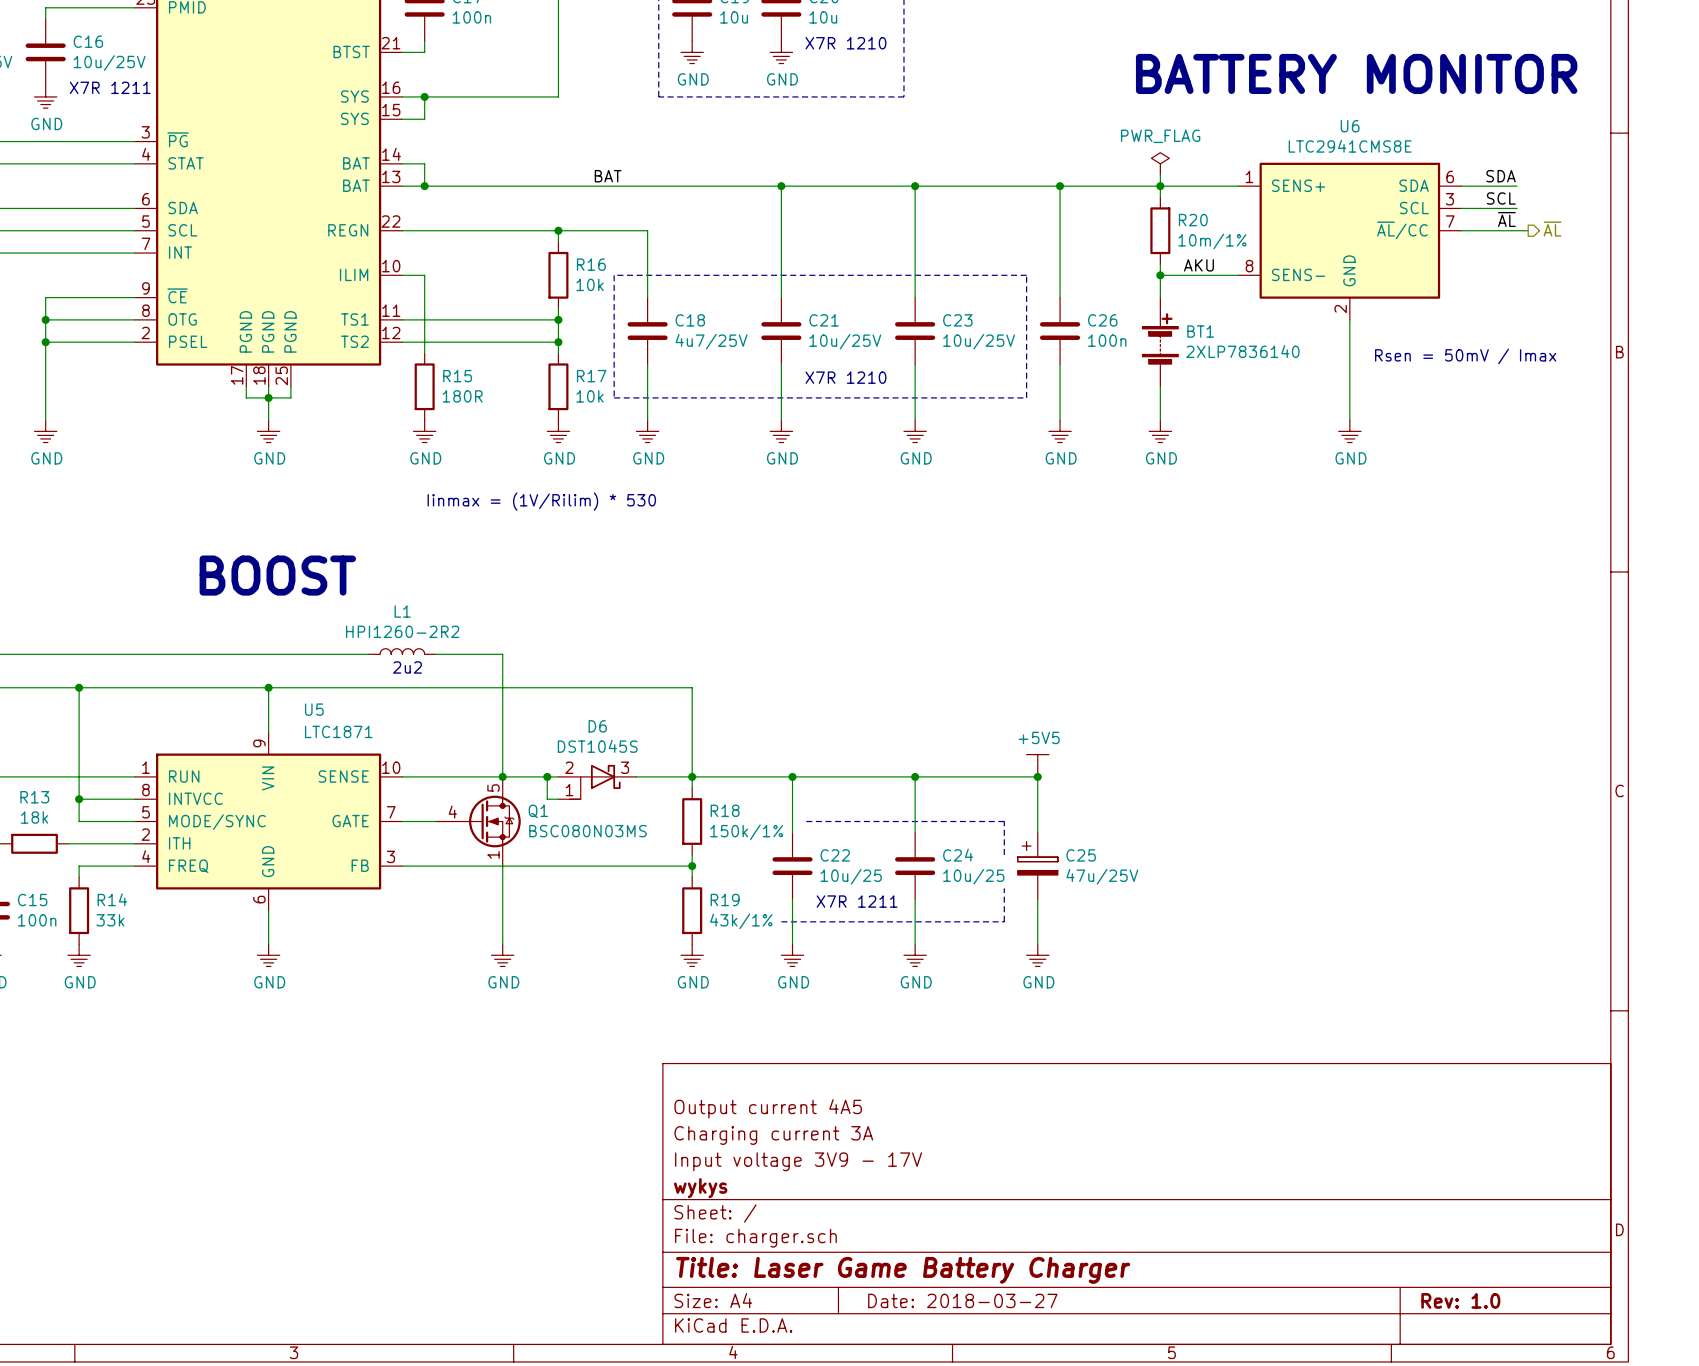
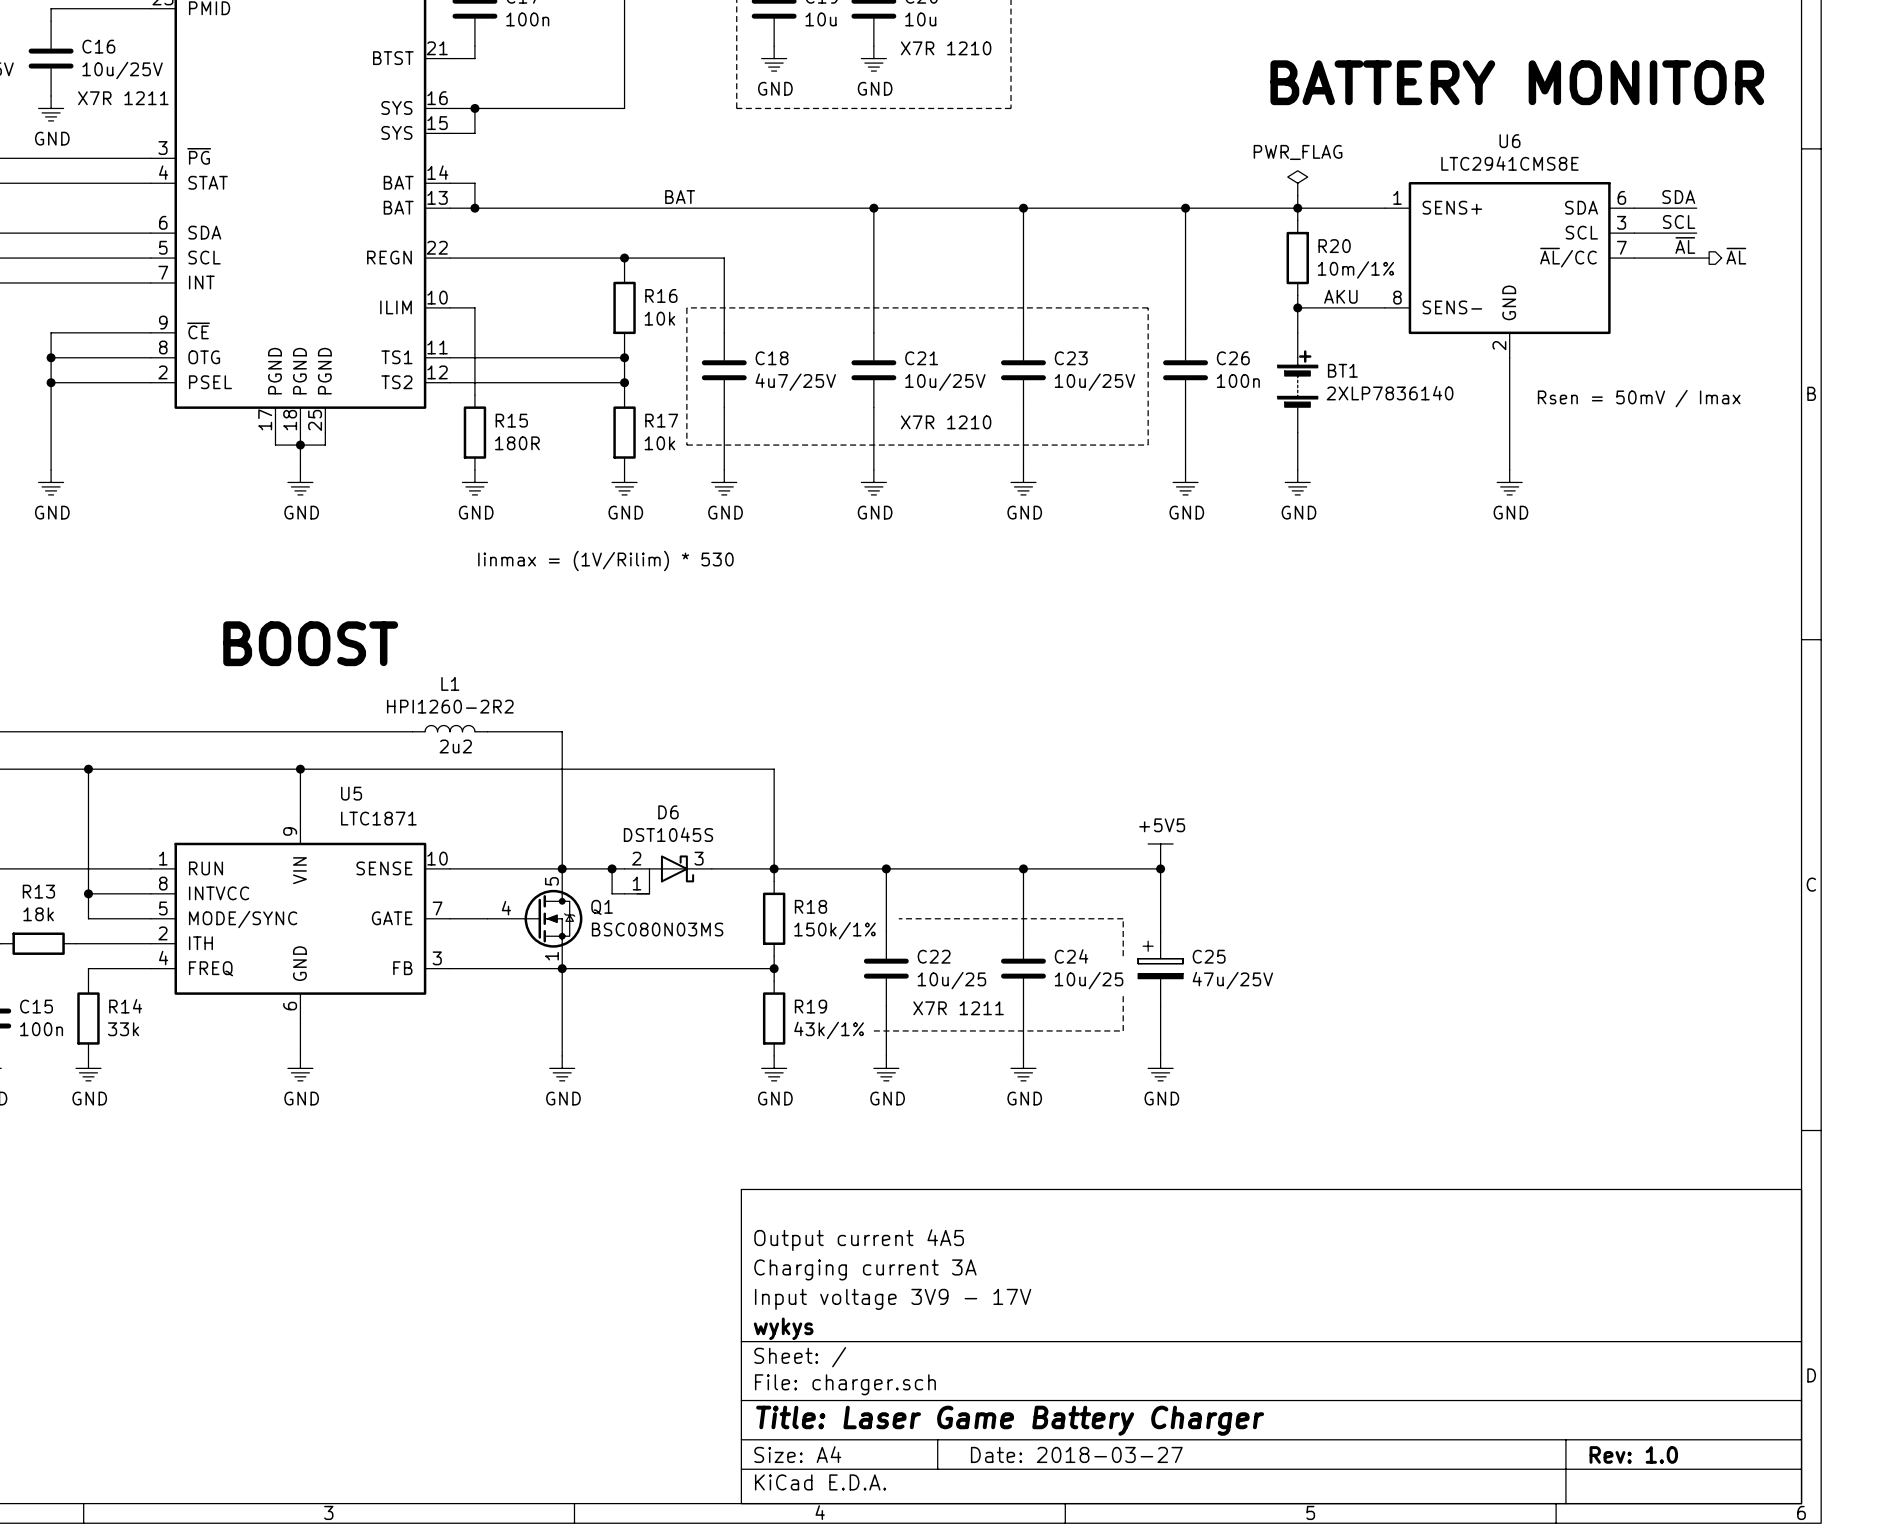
junction: none -> (562, 968)

